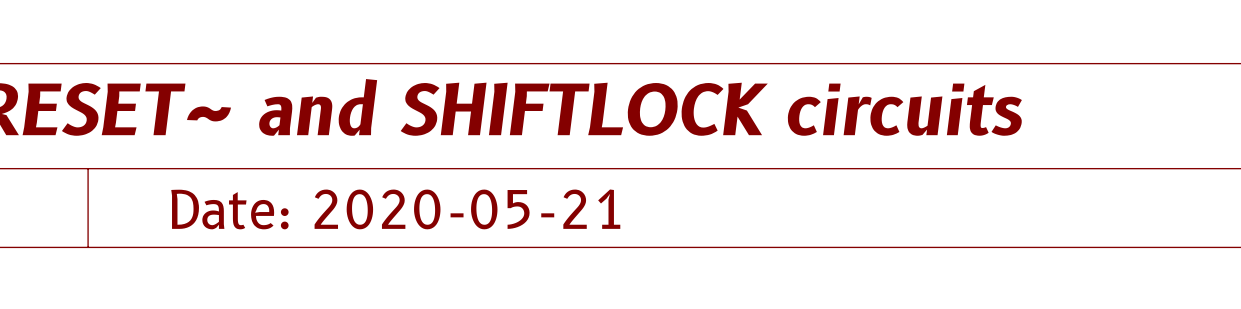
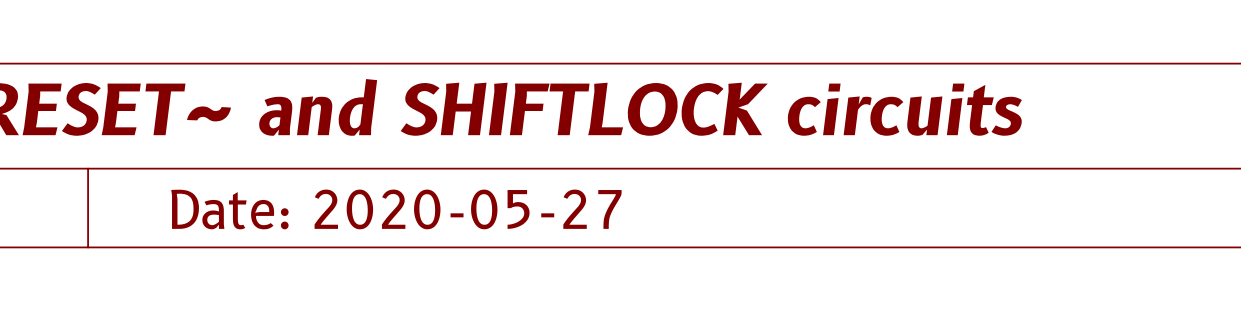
title block: Date: 2020-05-21 (395, 209) -> Date: 2020-05-27 (396, 209)

